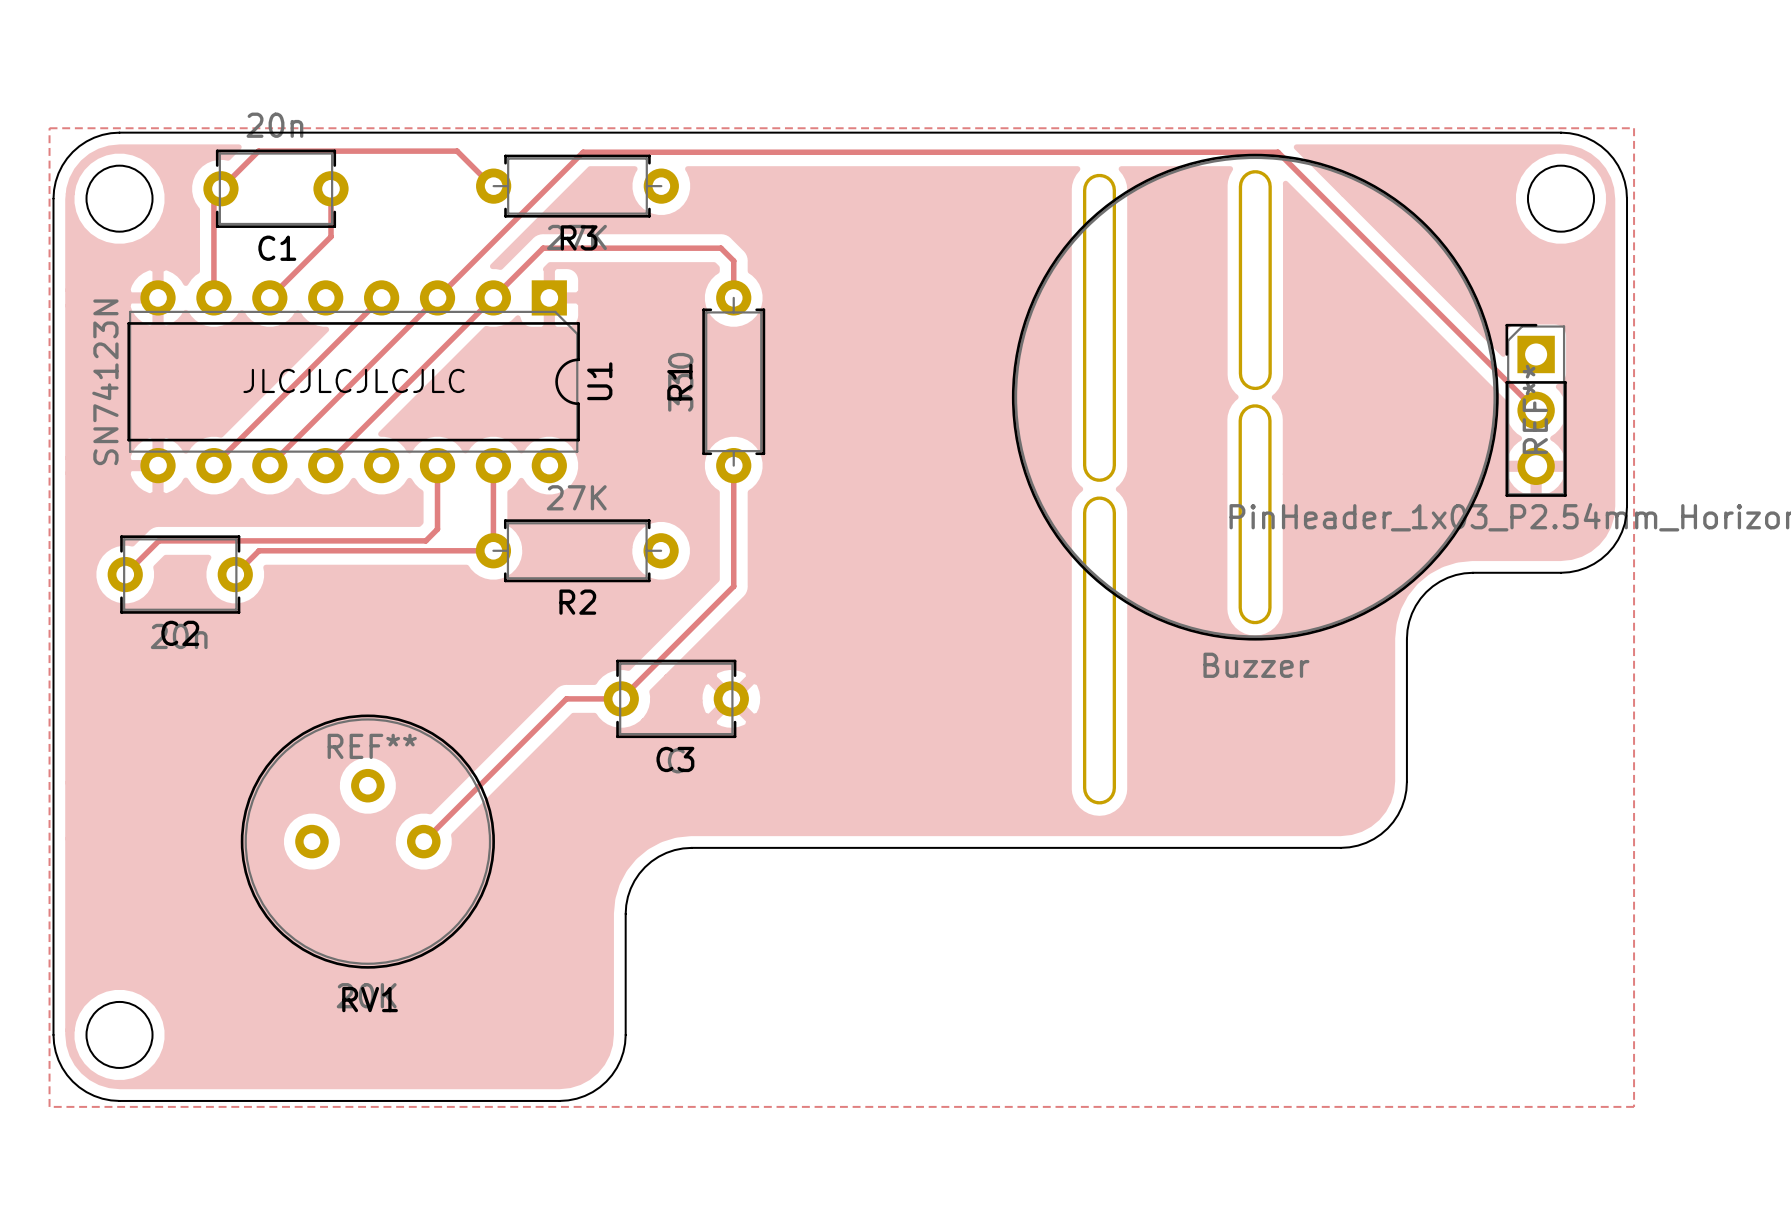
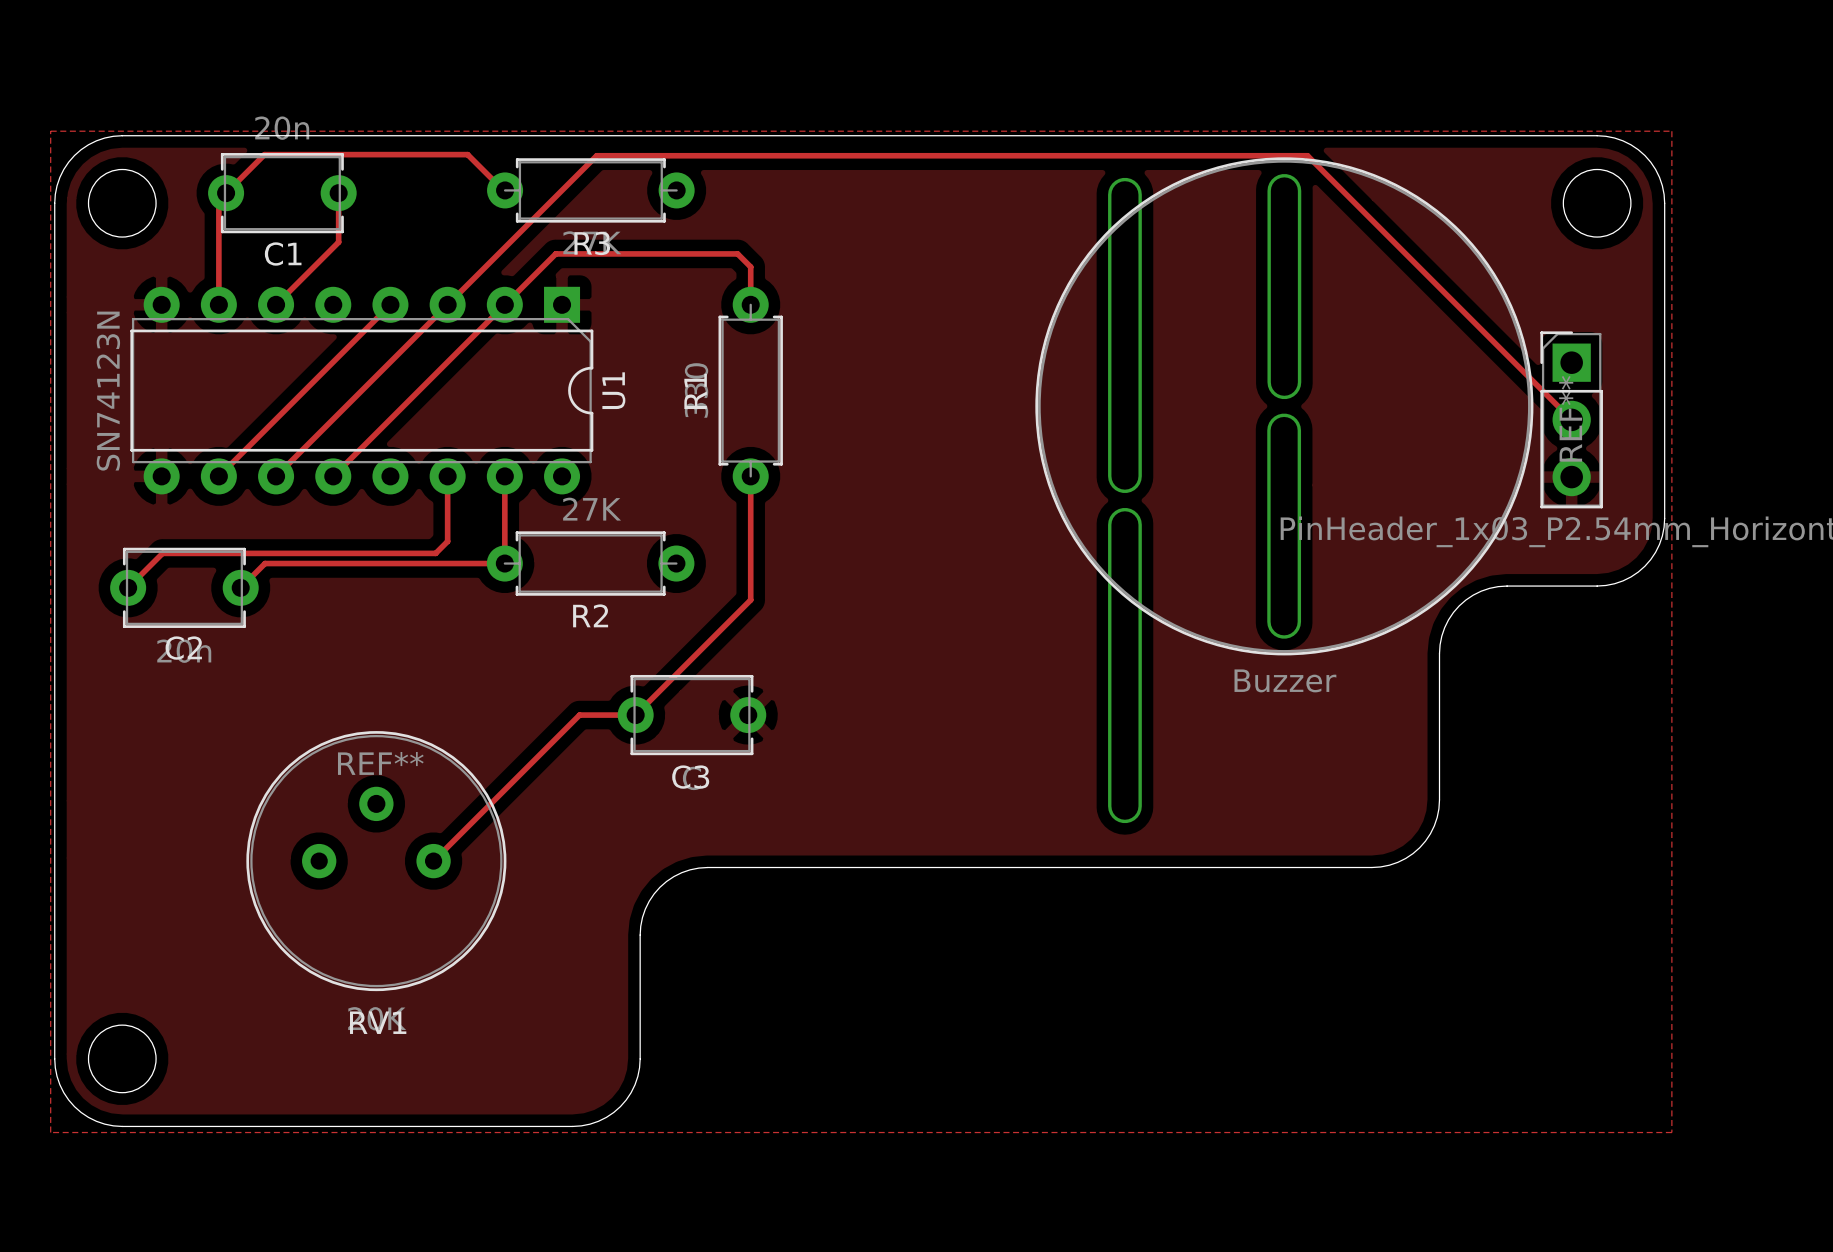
text: JLCJLCJLCJLC (354, 380) -> none

